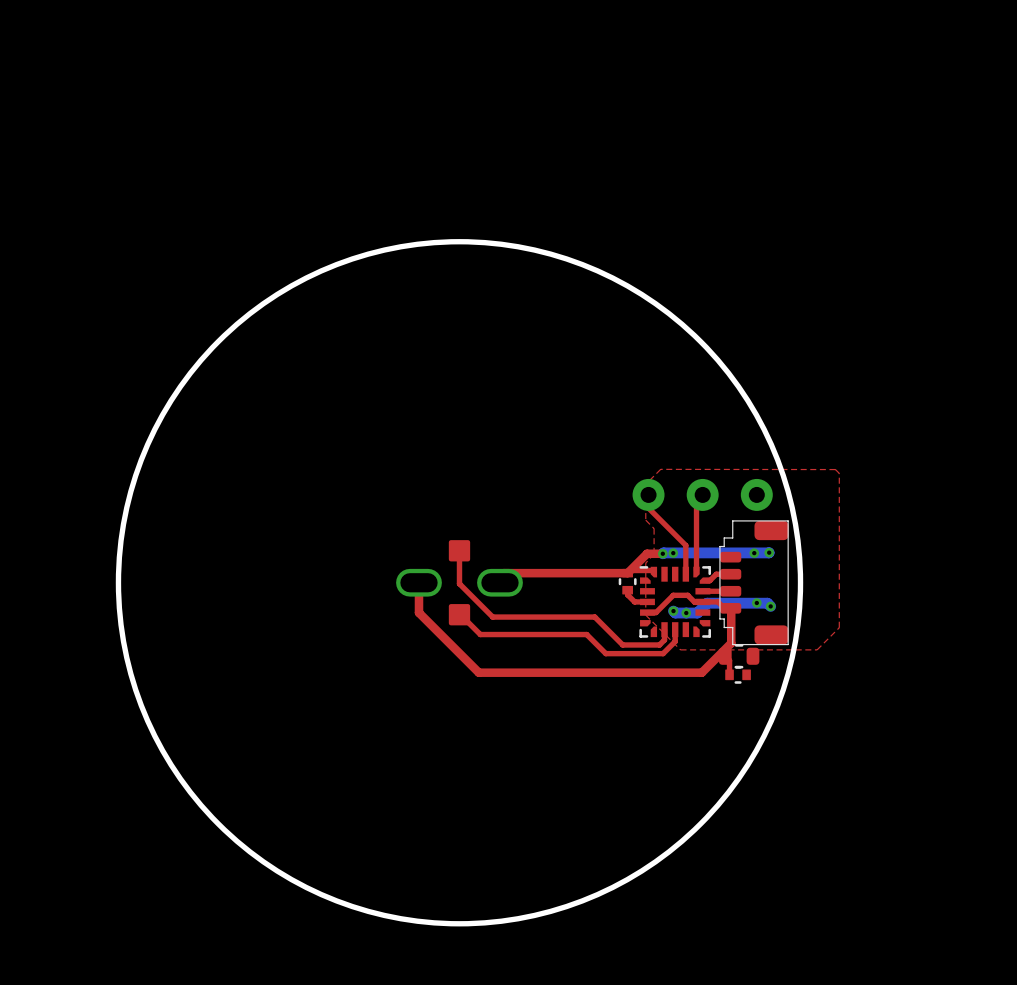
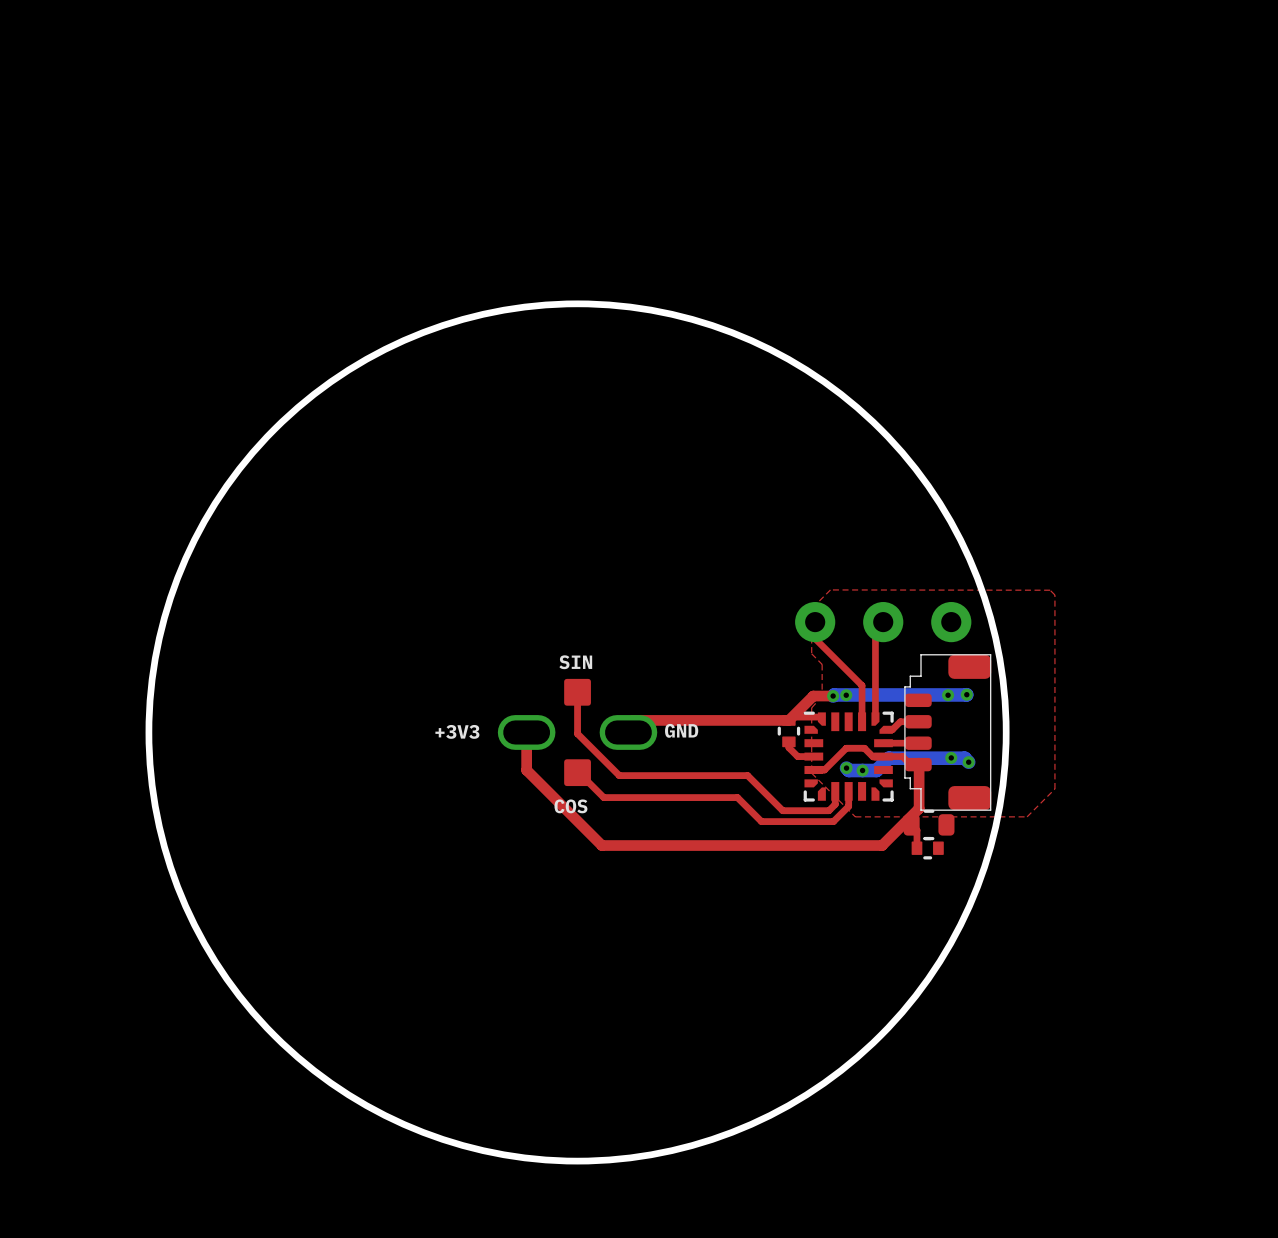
text: none -> SIN (575, 662)
text: none -> GND (681, 730)
text: none -> +3V3 (457, 731)
text: none -> COS (570, 806)

